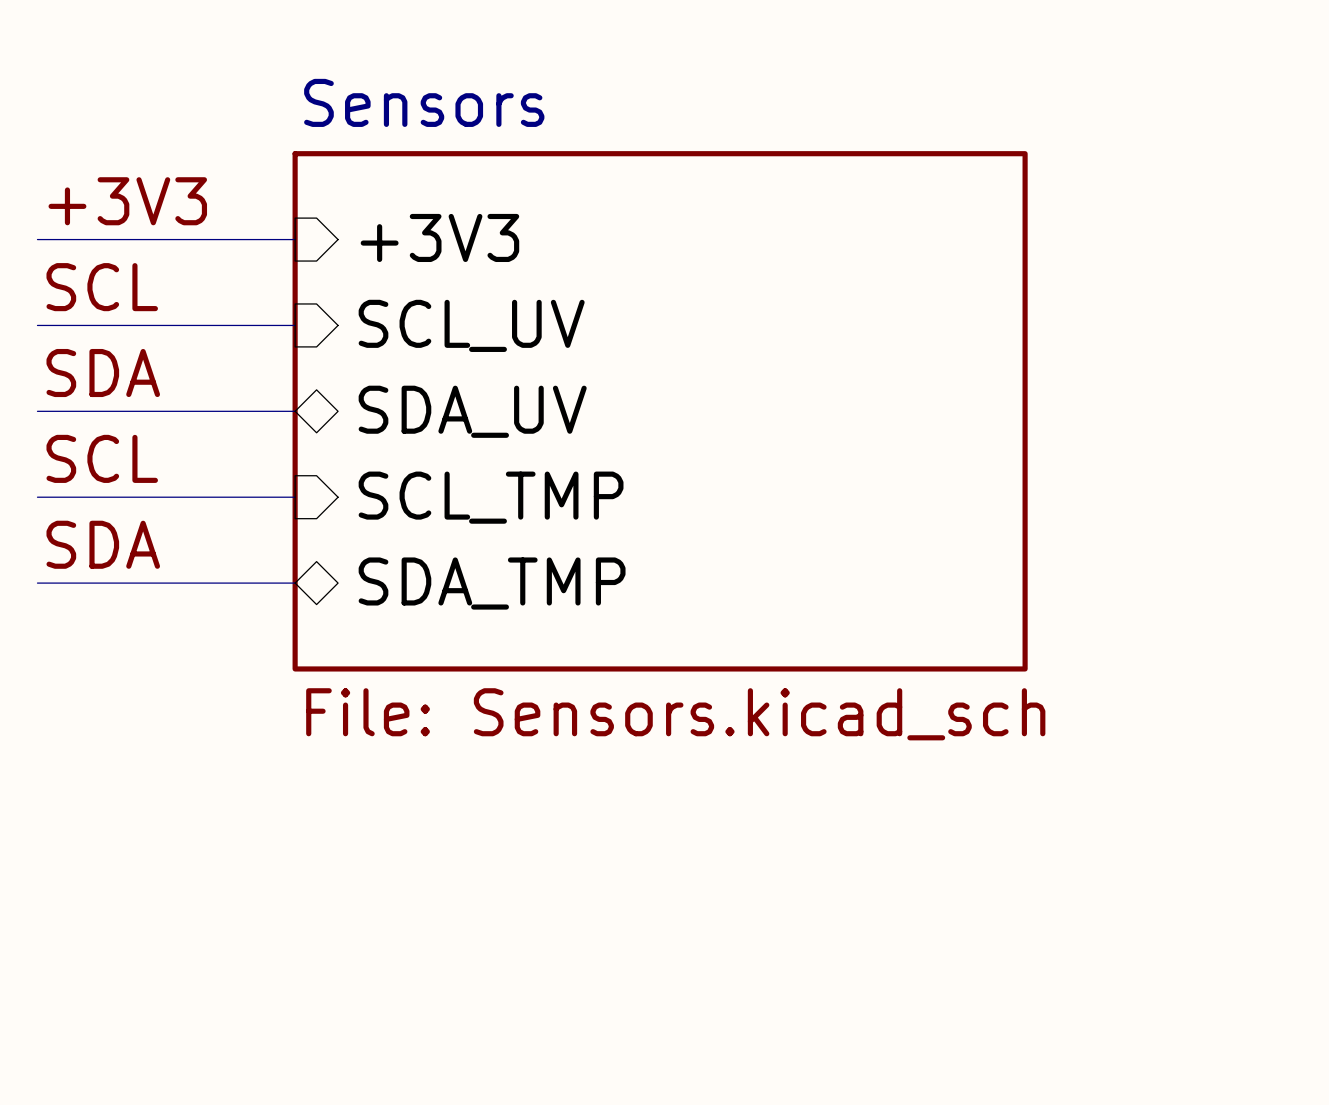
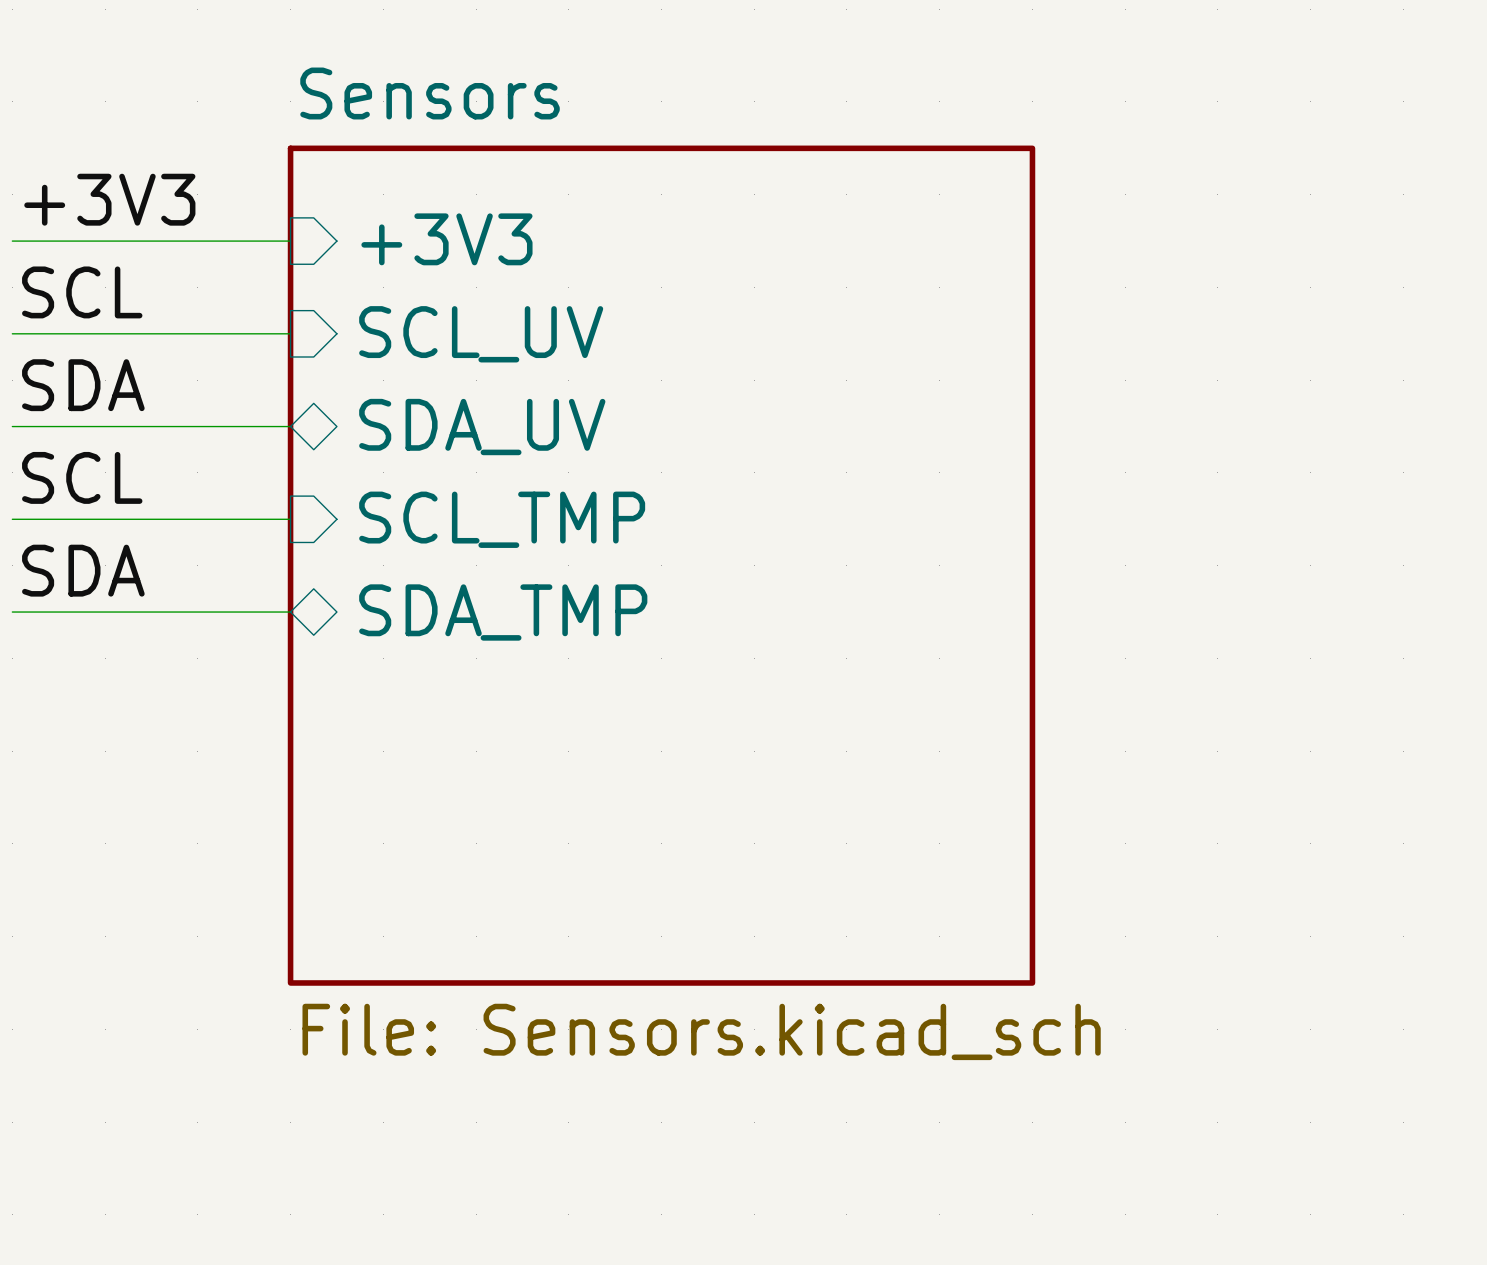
sheet Sensors: File: Sensors.kicad_sch (660, 411) -> none
sheet Sensors: none -> File: Sensors.kicad_sch (661, 565)

